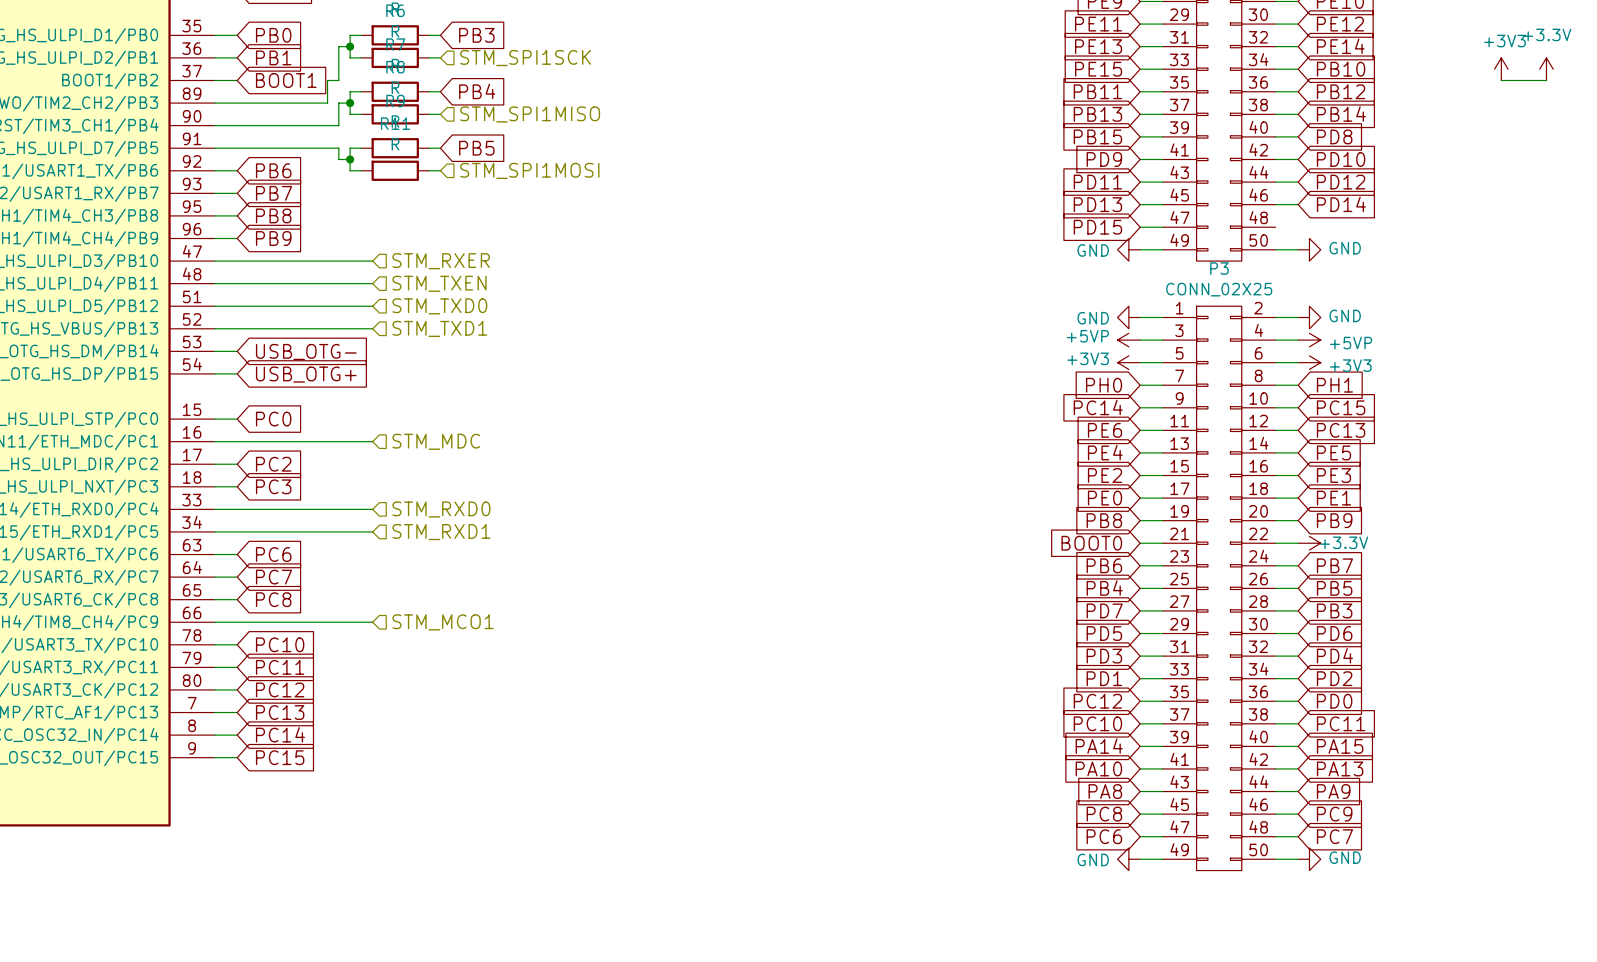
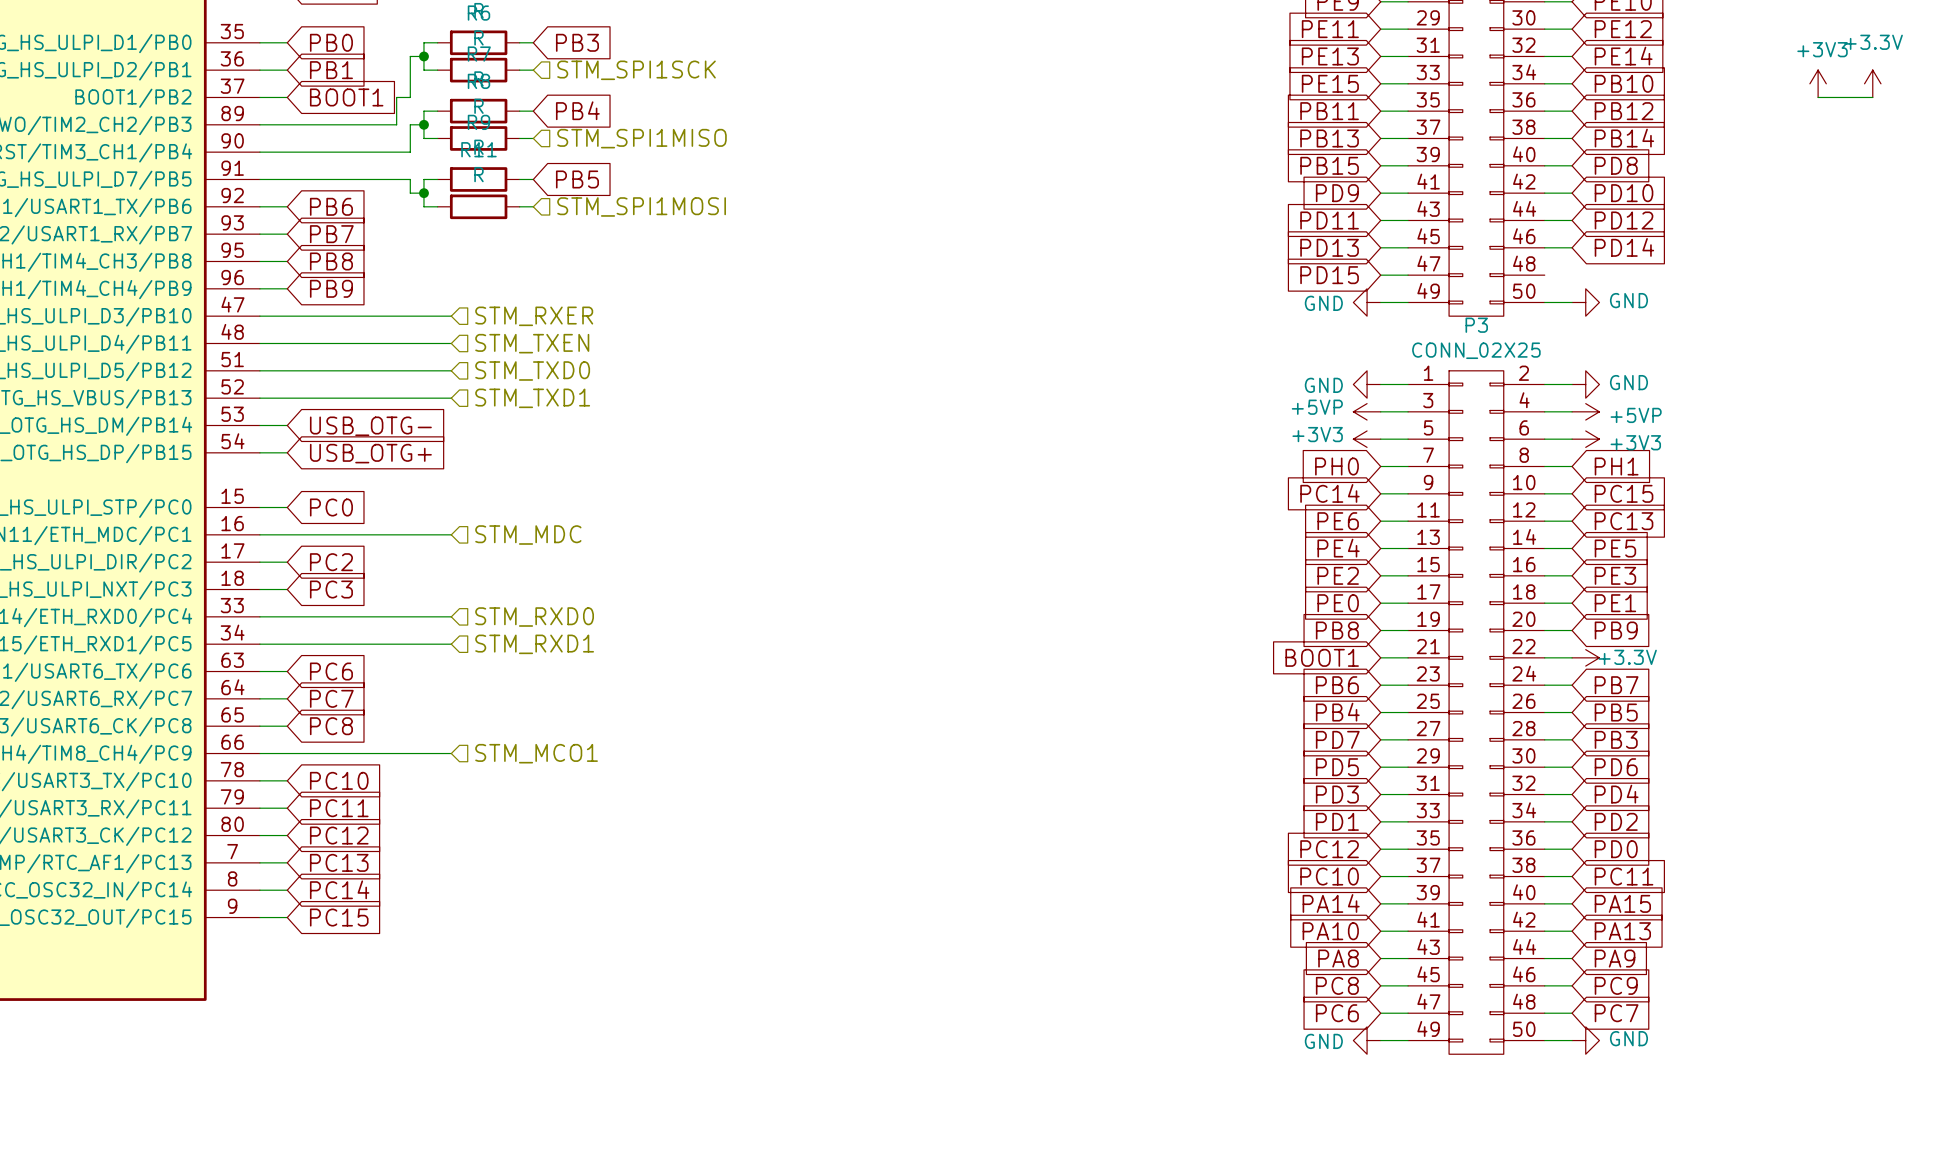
global label: BOOT0 (1091, 543) -> BOOT1 (1322, 657)

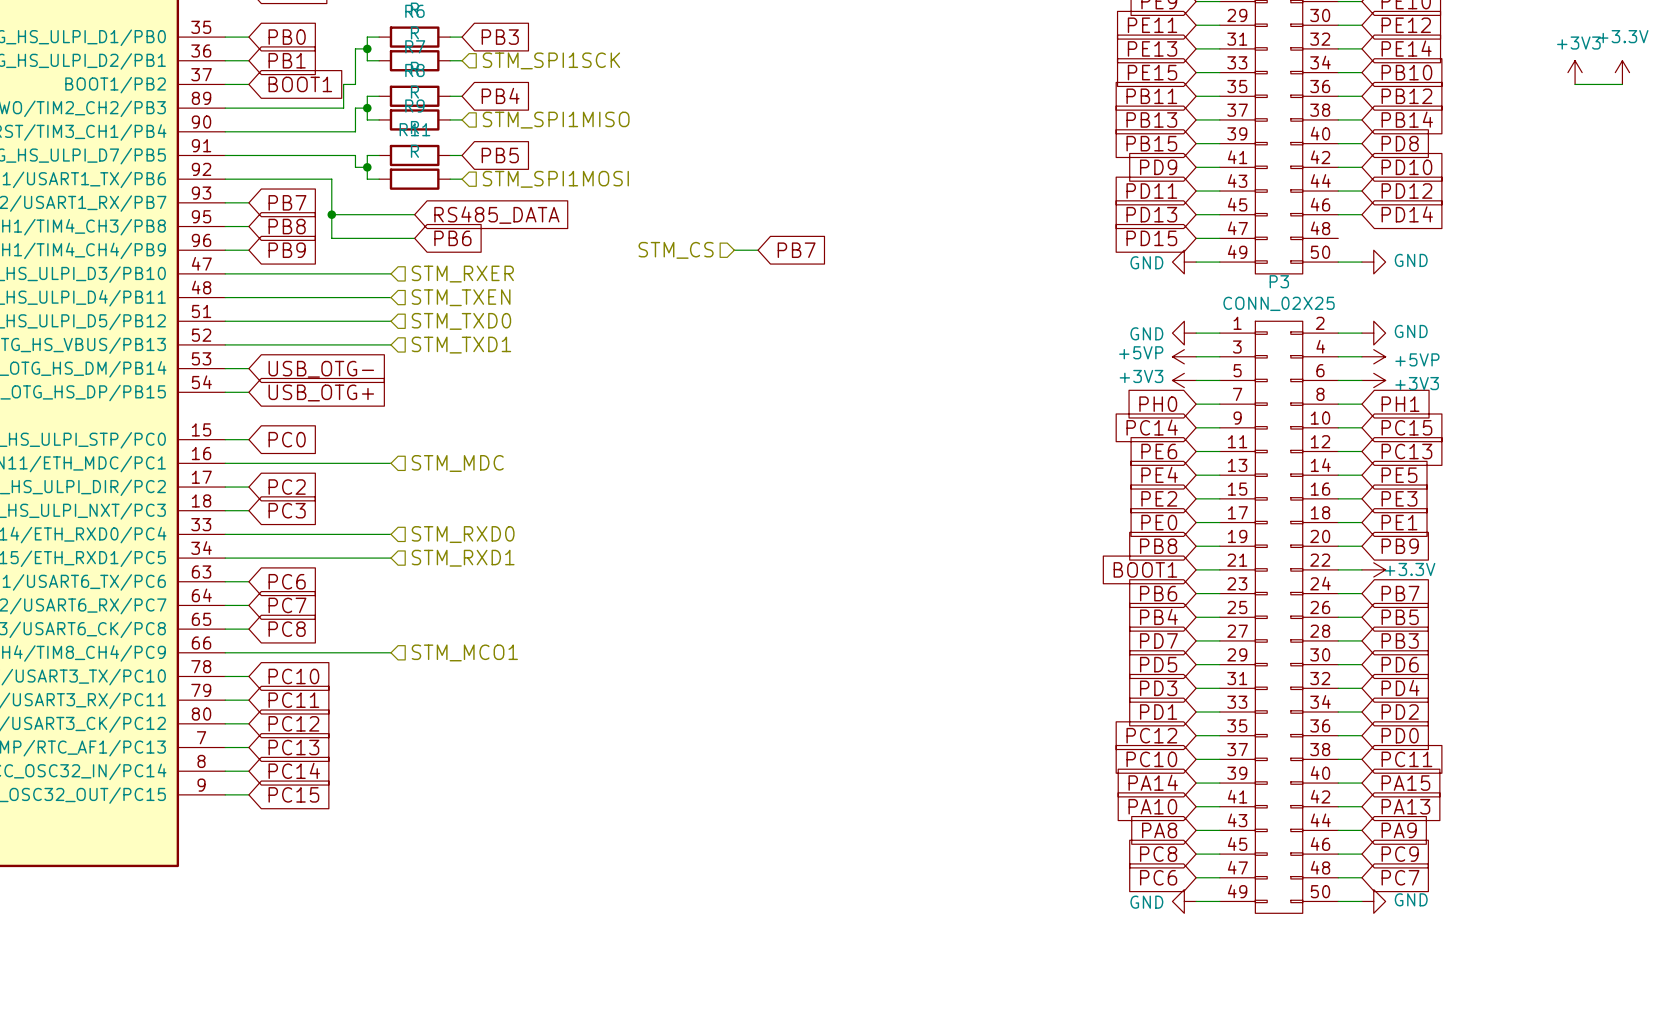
wire: none -> (248, 179) (331, 179) (331, 238) (414, 238)
global label position: PB6 (331, 206) -> PB6 (452, 238)
wire: none -> (331, 214) (414, 214)
junction: none -> (331, 214)
global label: none -> RS485_DATA (496, 215)
hierarchical label: none -> STM_CS (676, 250)
wire: none -> (734, 250) (758, 250)
global label: none -> PB7 (796, 250)

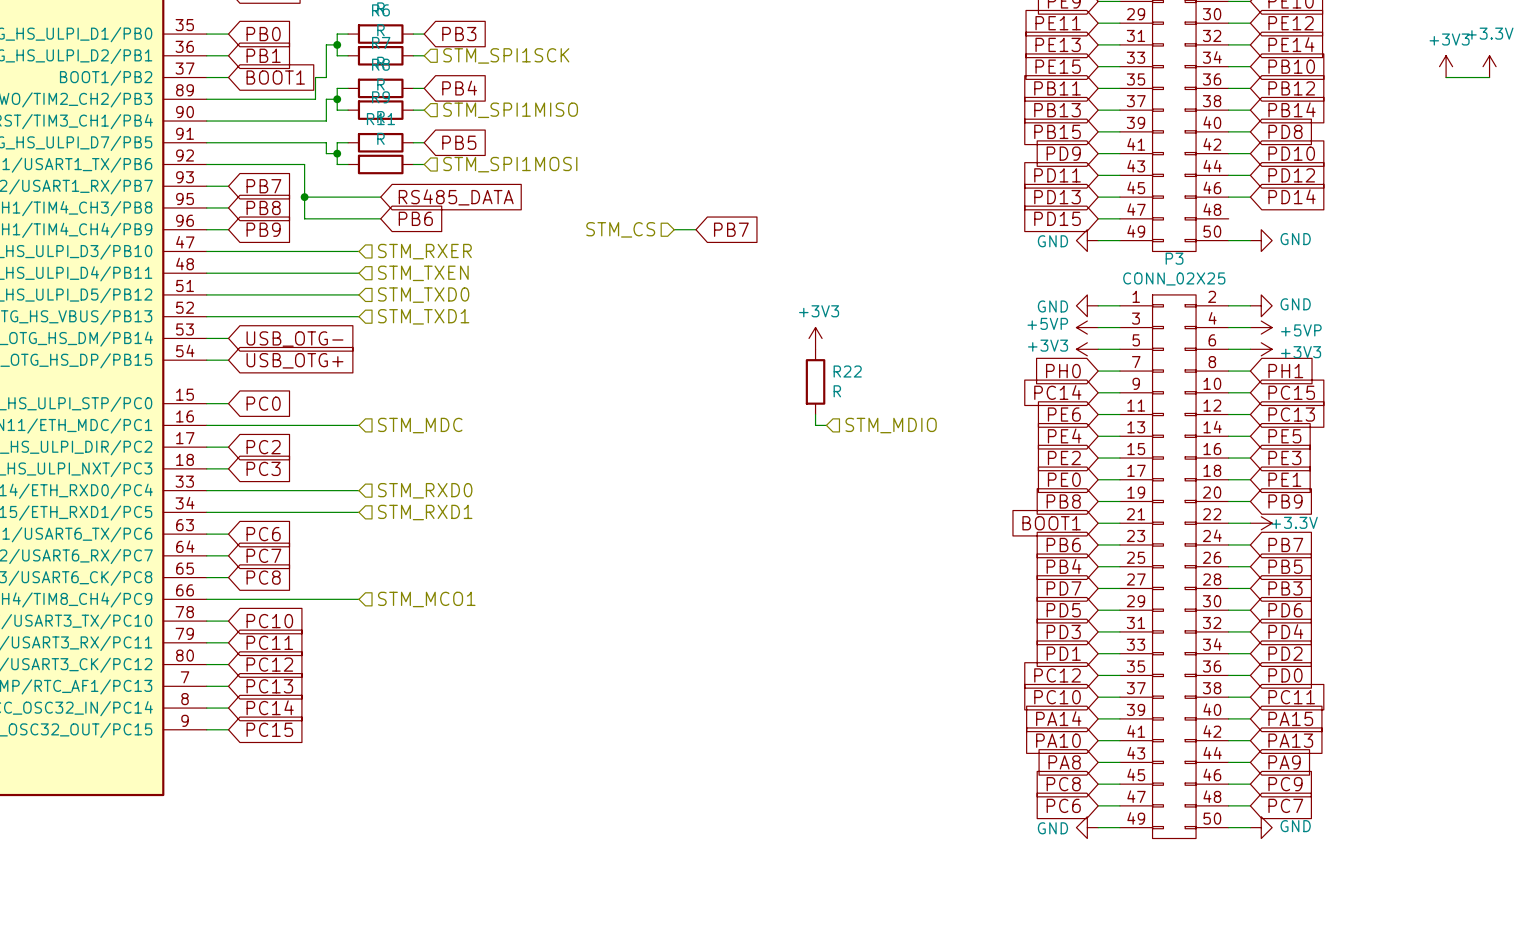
power symbol: none -> +3V3 (815, 338)
R22: none -> R (815, 381)
wire: none -> (815, 414) (815, 425) (826, 425)
hierarchical label: none -> STM_MDIO (891, 425)

